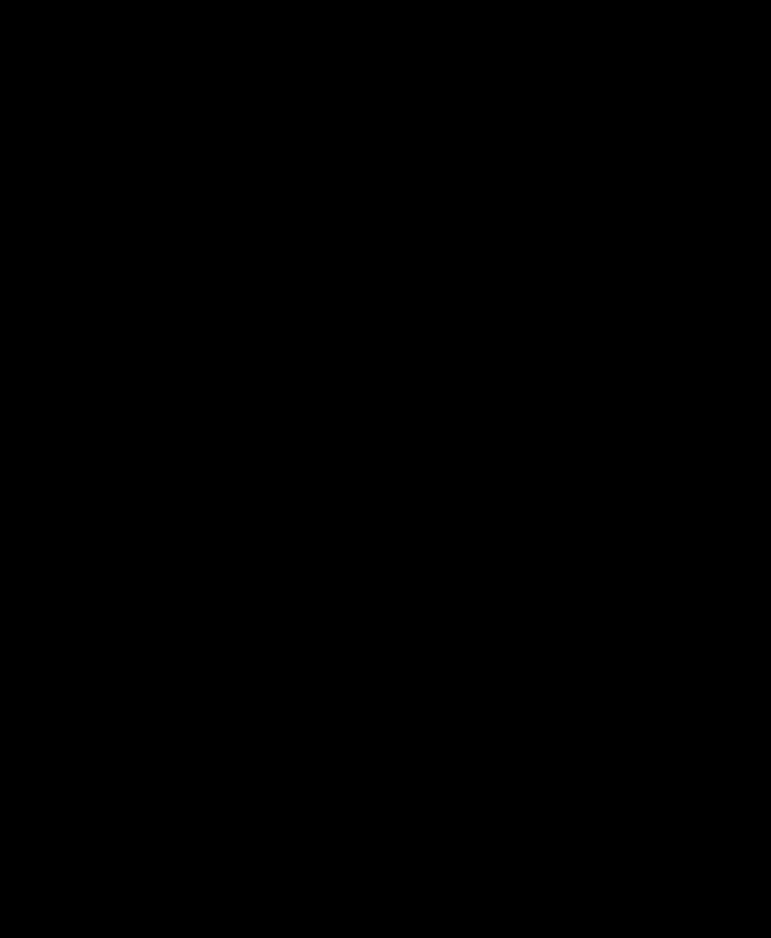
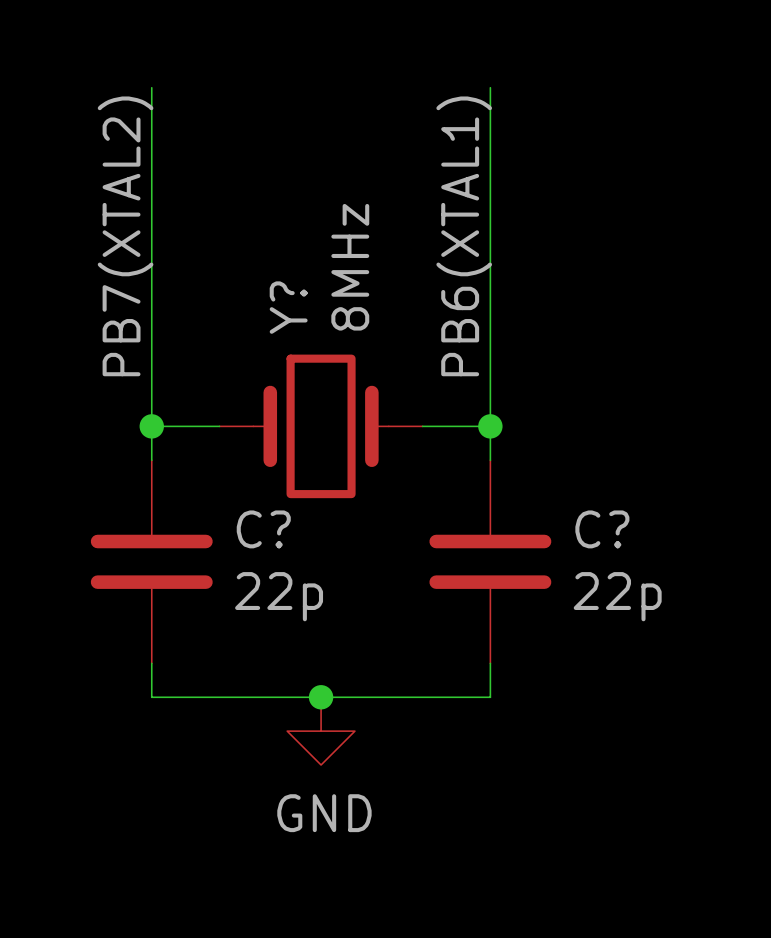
wire: none -> (151, 87) (151, 460)
wire: none -> (490, 87) (490, 460)
label: none -> PB7(XTAL2) (125, 236)
label: none -> PB6(XTAL1) (464, 236)
wire: none -> (151, 426) (219, 426)
junction: none -> (151, 426)
Y?: none -> 8MHz (321, 426)
wire: none -> (422, 426) (490, 426)
junction: none -> (490, 426)
C?: none -> 22p (151, 561)
C?: none -> 22p (490, 561)
wire: none -> (151, 663) (151, 697) (490, 697) (490, 663)
junction: none -> (321, 697)
power symbol: none -> GND (321, 731)

